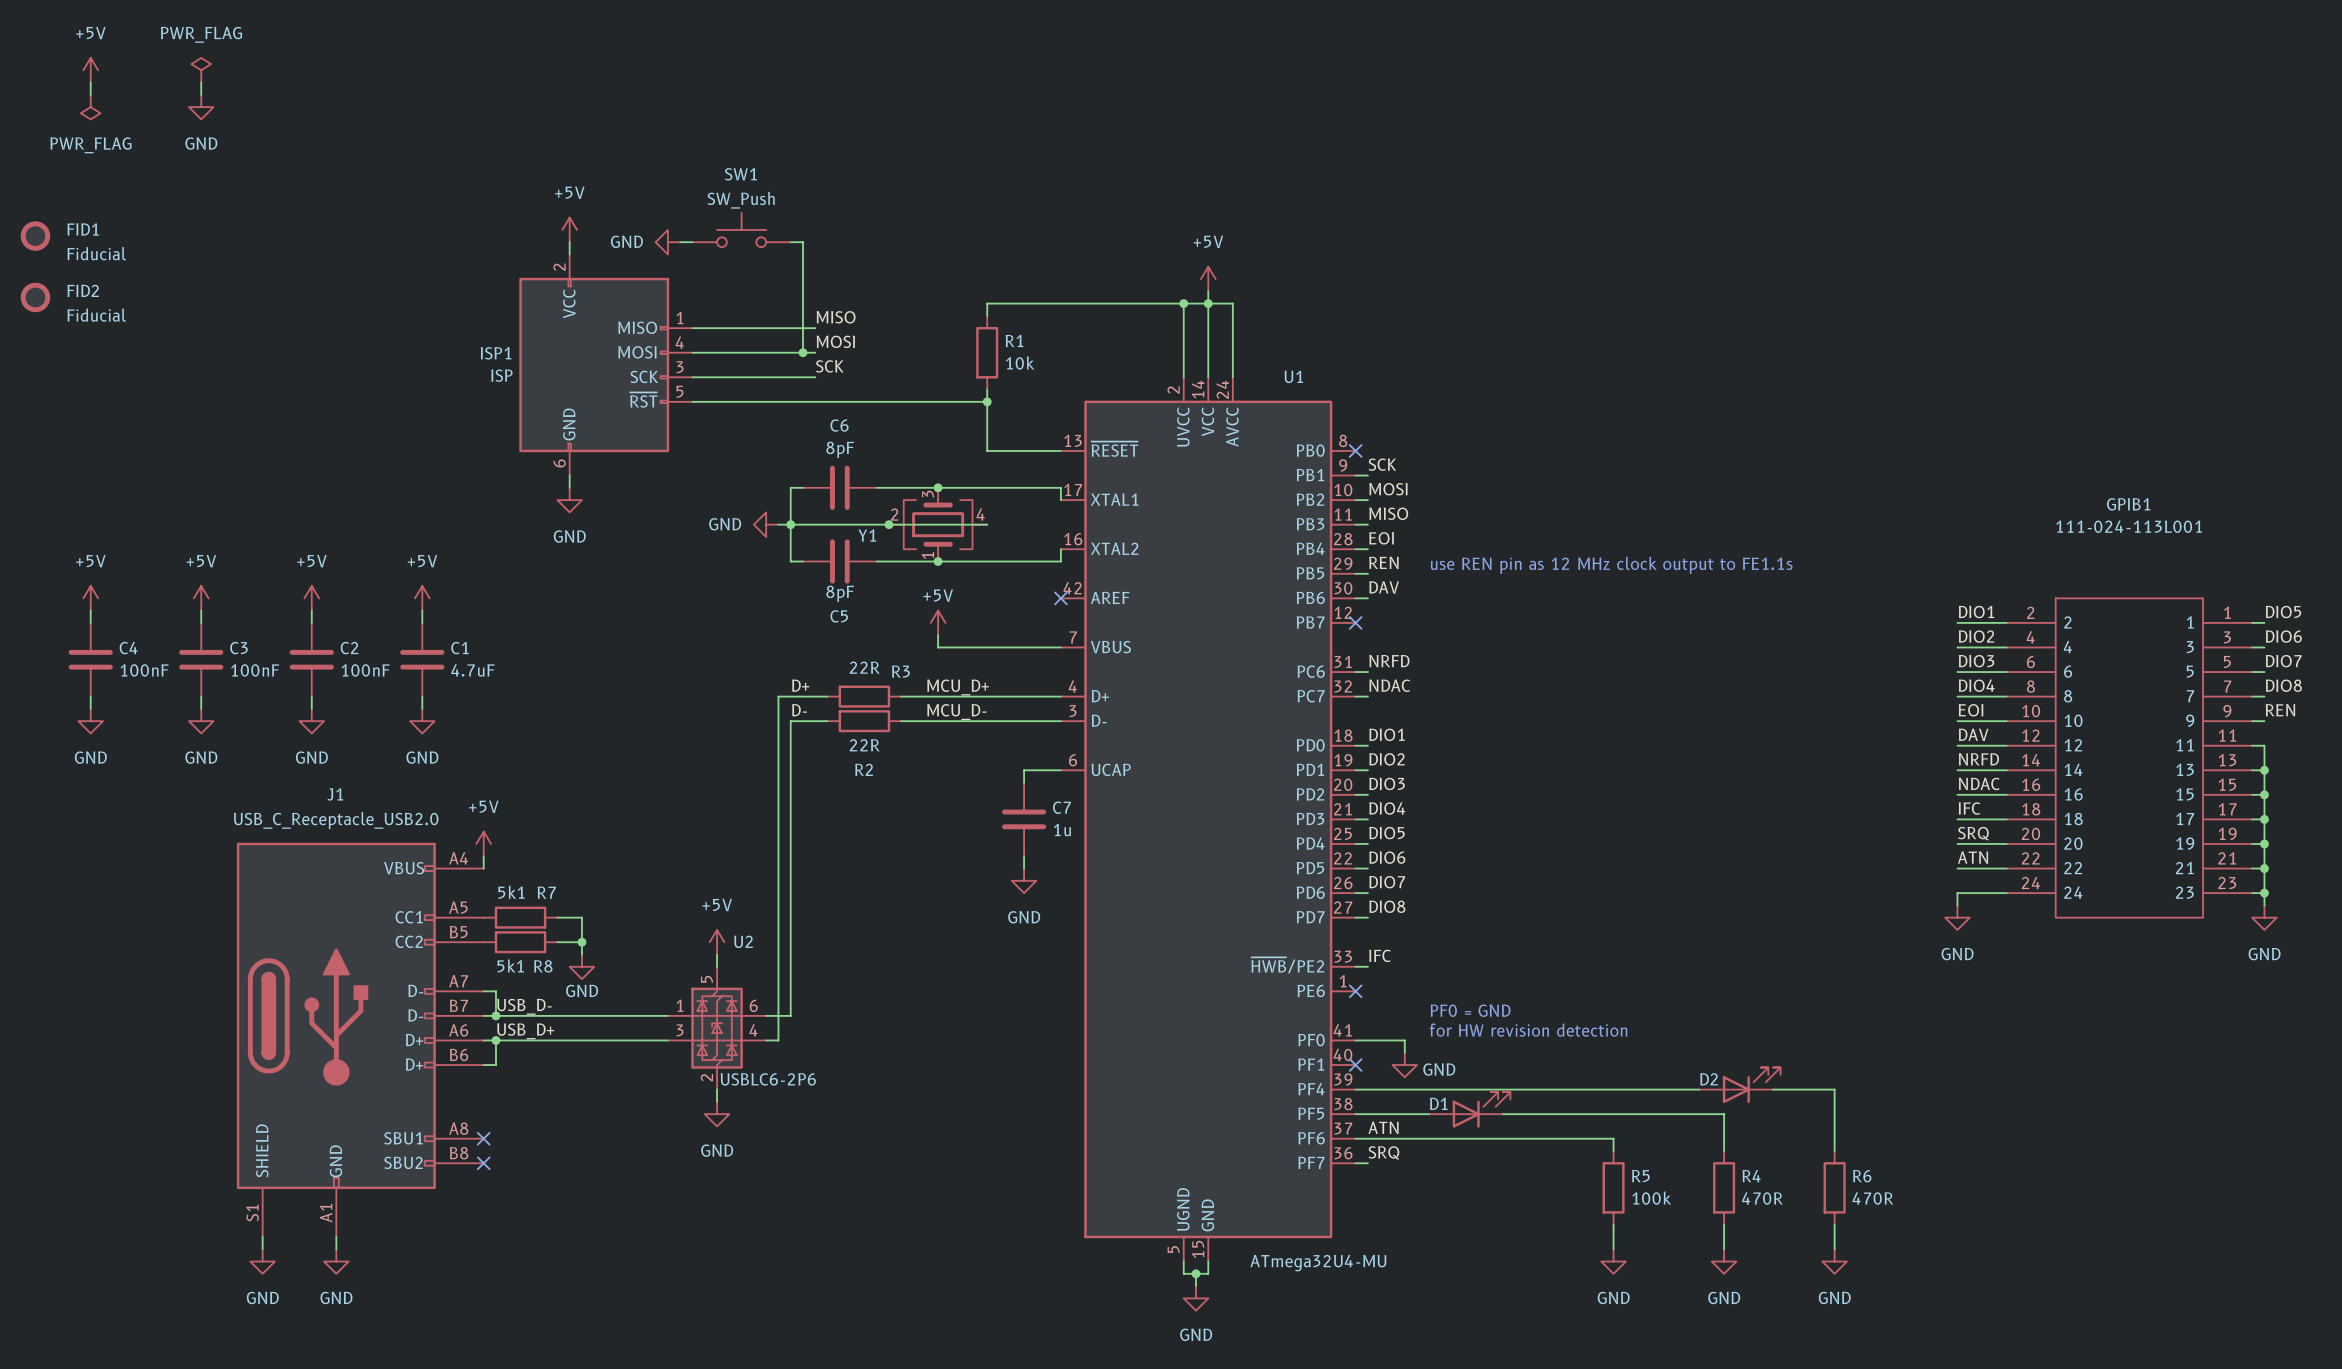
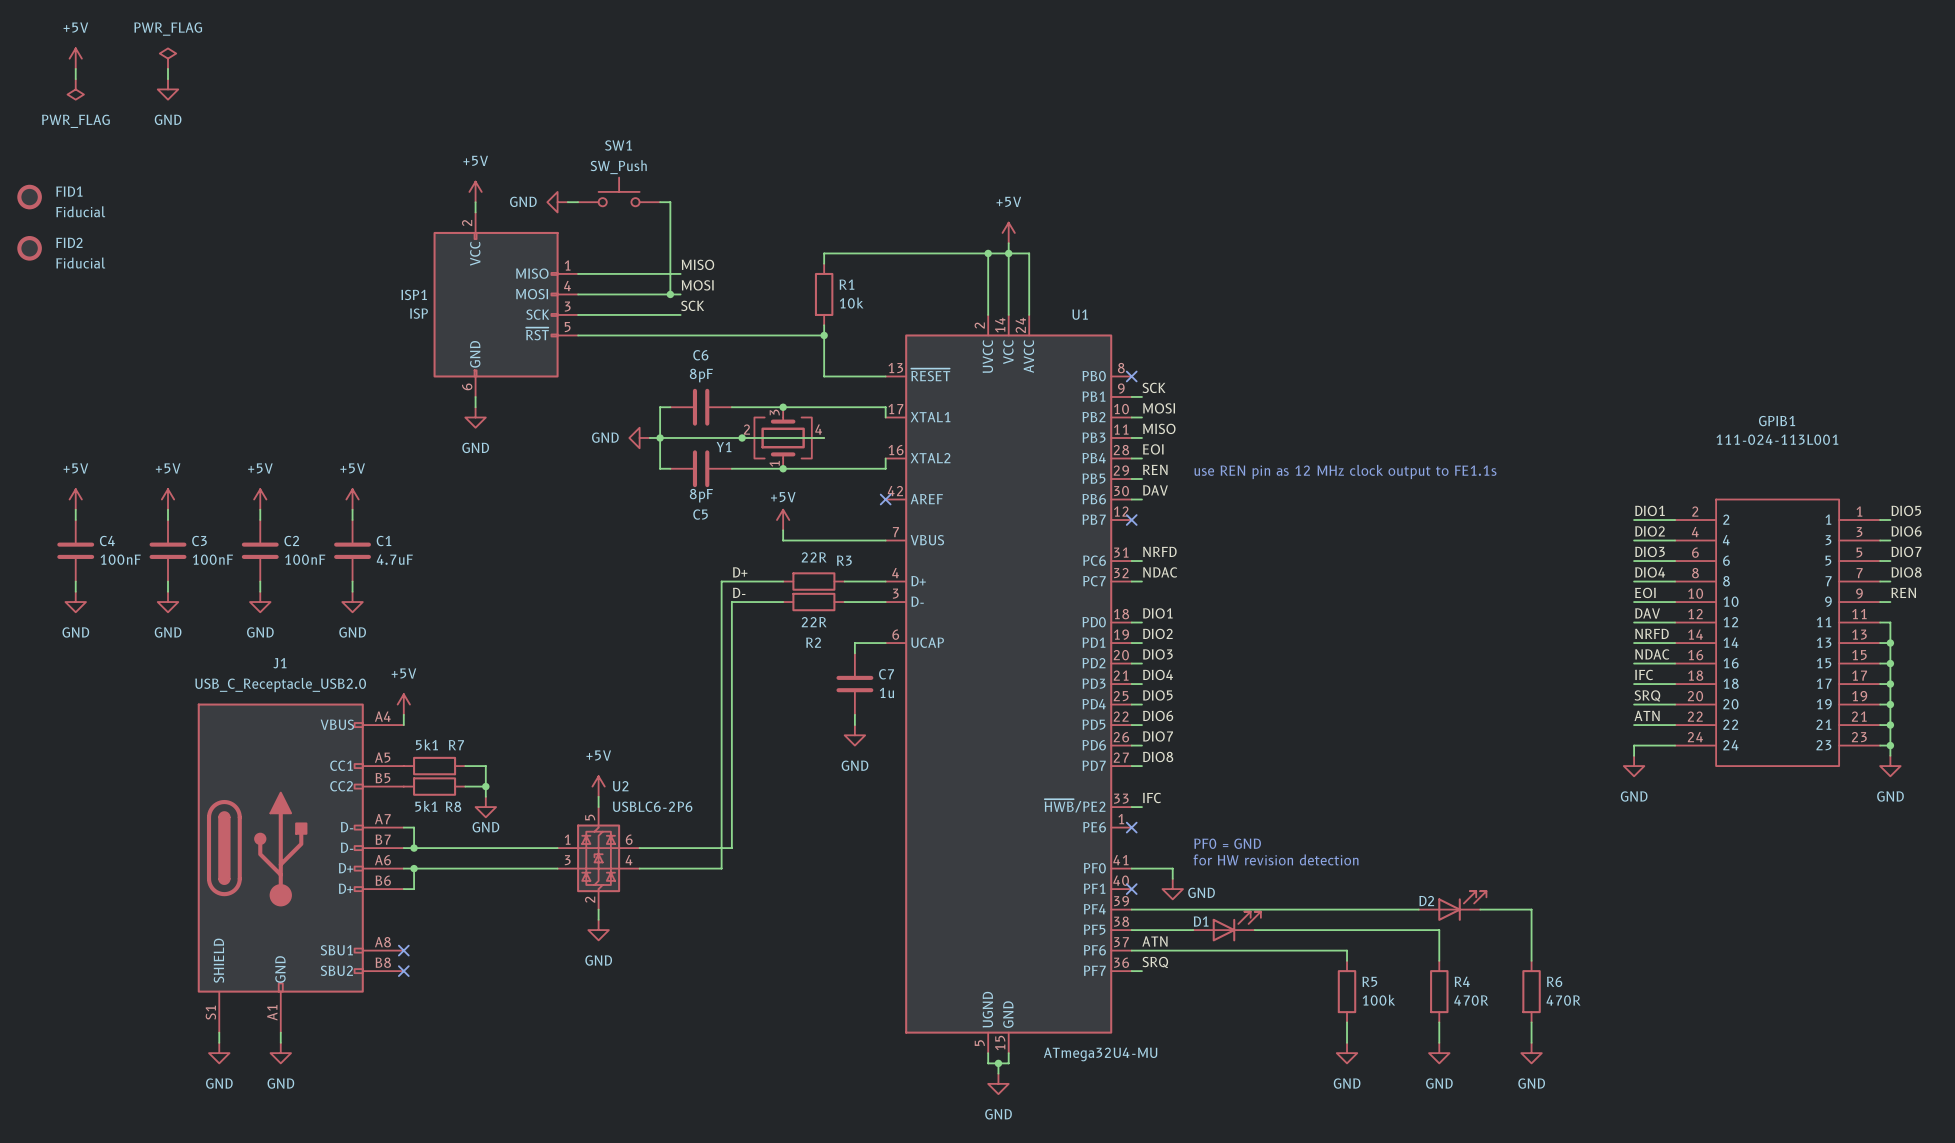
label position: D+ (800, 685) -> D+ (740, 572)
label: MCU_D+ (958, 687) -> none
wire: (827, 696) (778, 696) (778, 1040) -> (752, 581) (721, 581) (721, 868) (649, 868)
R3 position: (864, 696) -> (813, 581)
wire: (938, 696) (1011, 696) -> none
label position: D- (799, 710) -> D- (739, 592)
label: MCU_D- (956, 712) -> none
wire: (827, 721) (790, 721) (790, 1015) -> (752, 602) (731, 602) (731, 848) (660, 848)
R2 position: (864, 721) -> (813, 602)
wire: (938, 721) (1011, 721) -> none
label: USB_D- (524, 1006) -> none
label: USB_D+ (525, 1031) -> none
U2 value position: USBLC6-2P6 (768, 1079) -> USBLC6-2P6 (652, 806)

